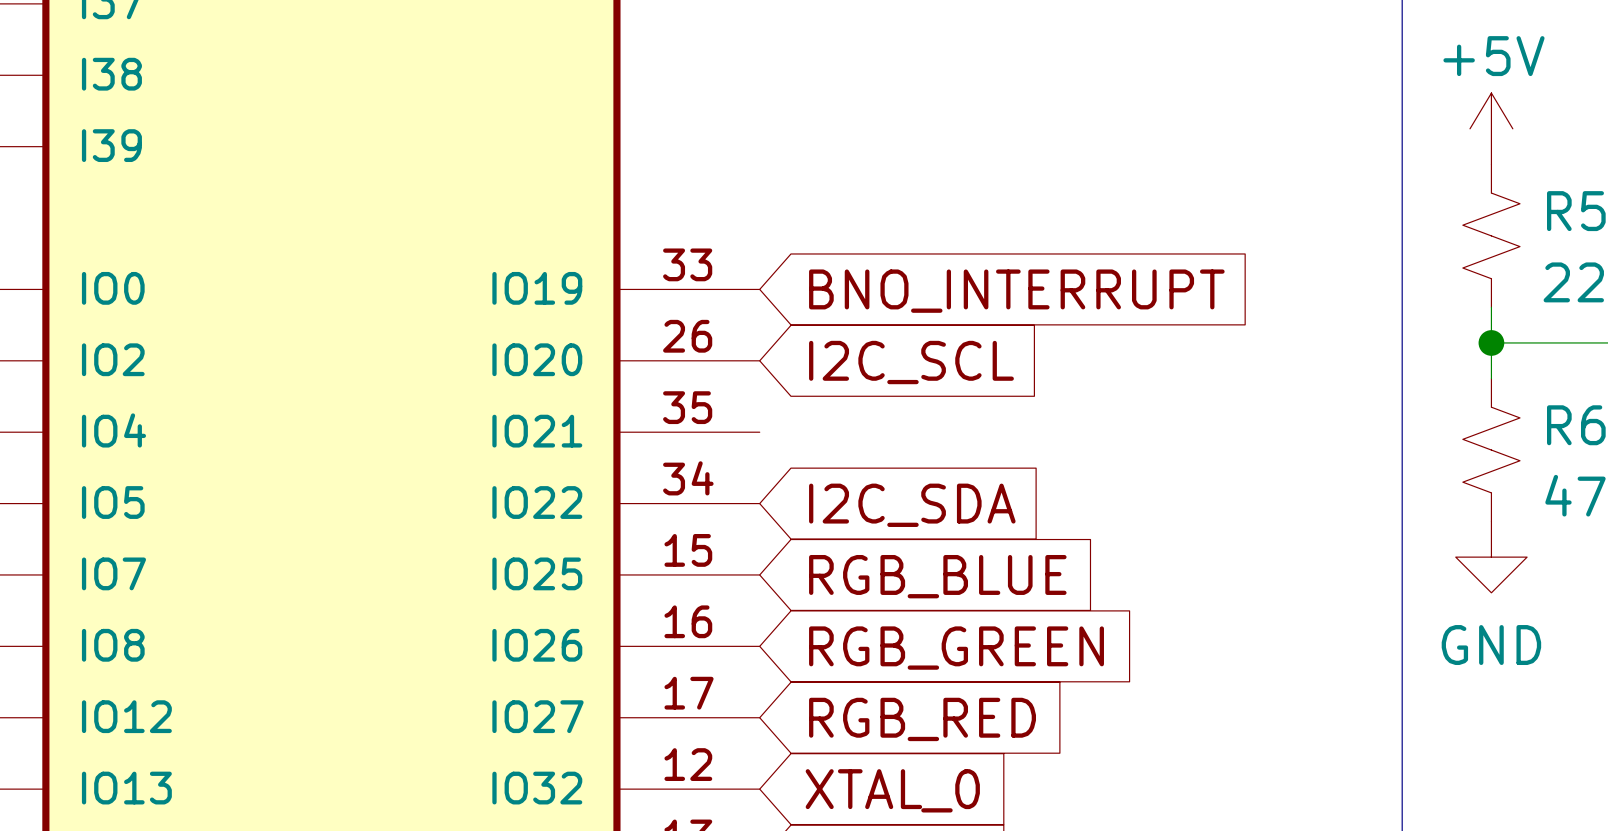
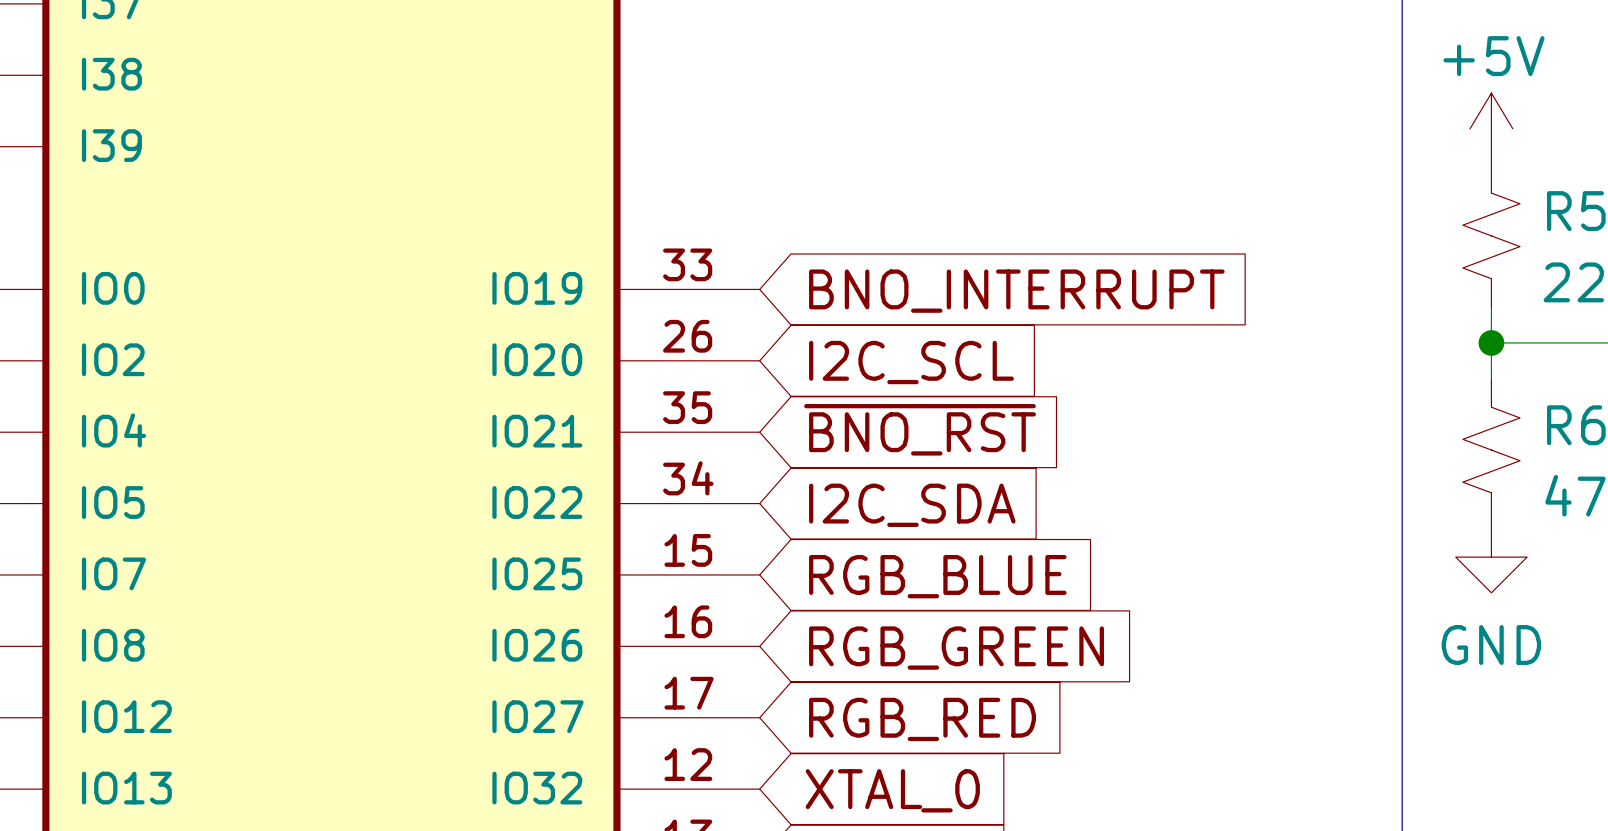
global label: none -> ~{BNO_RST} (920, 429)

